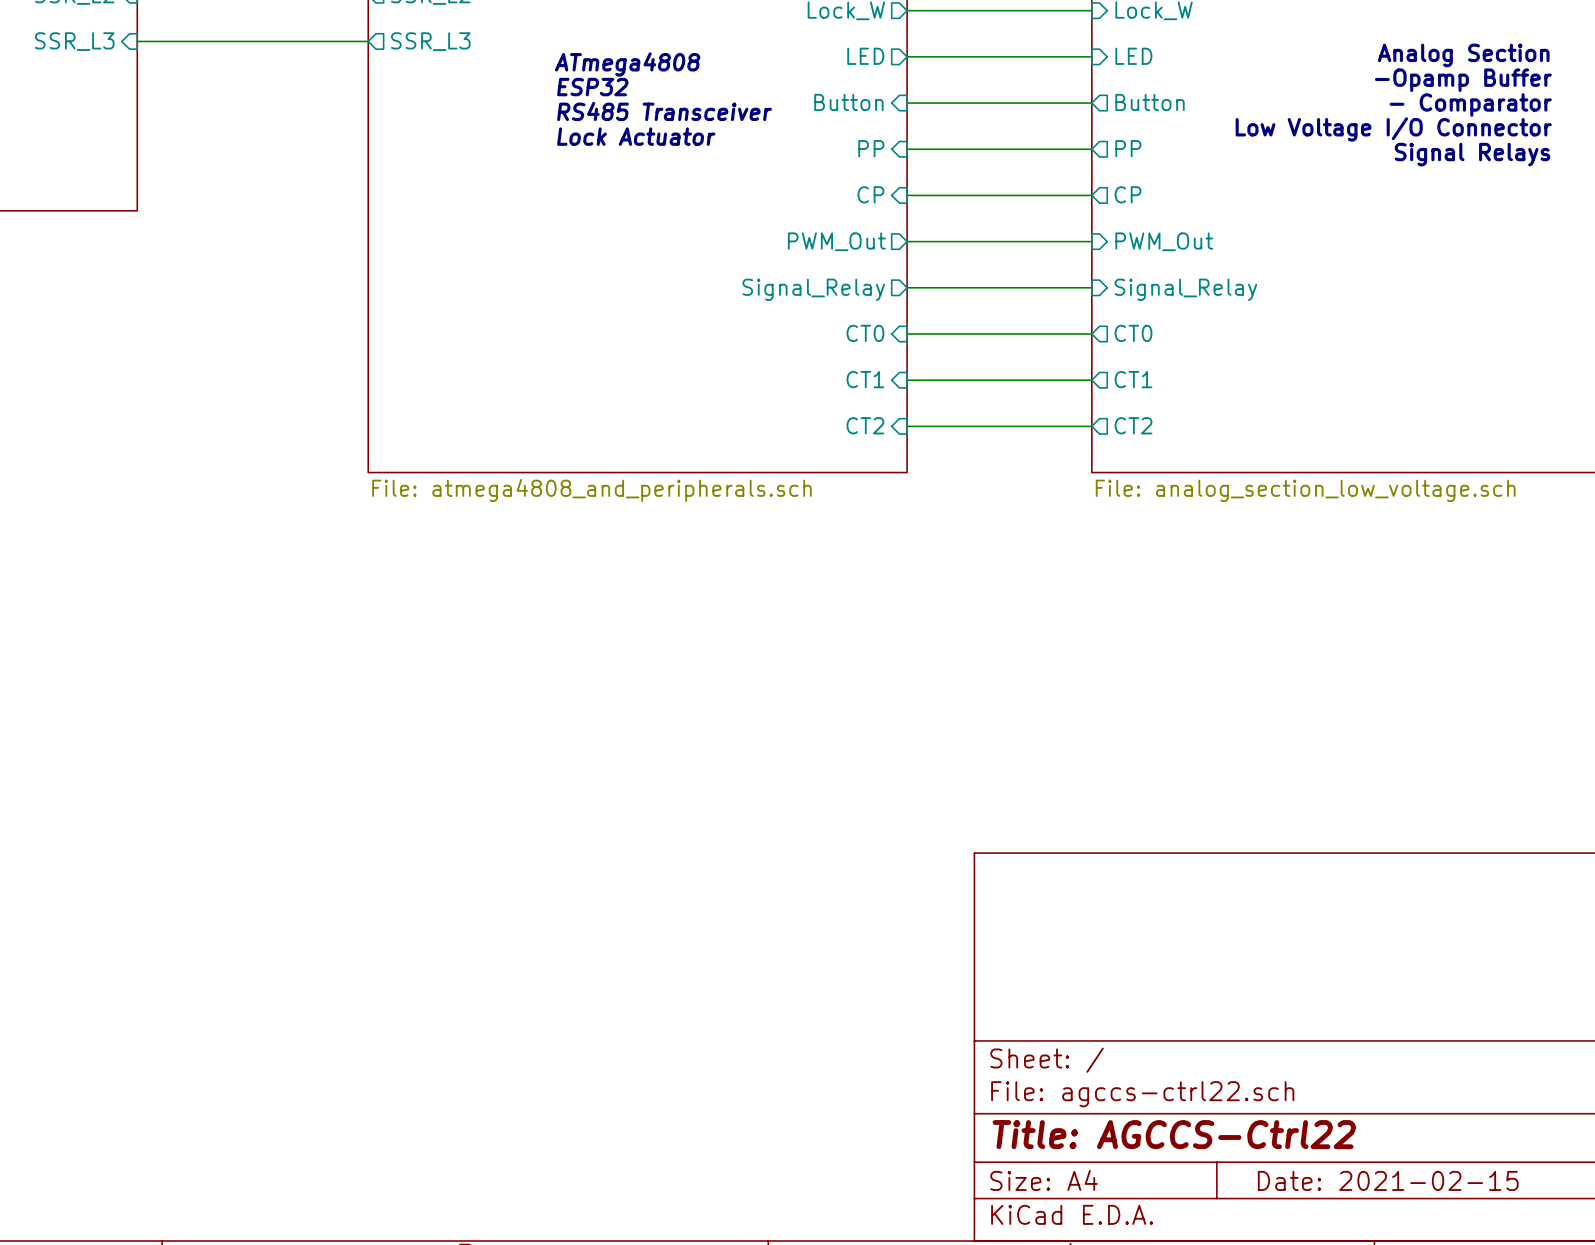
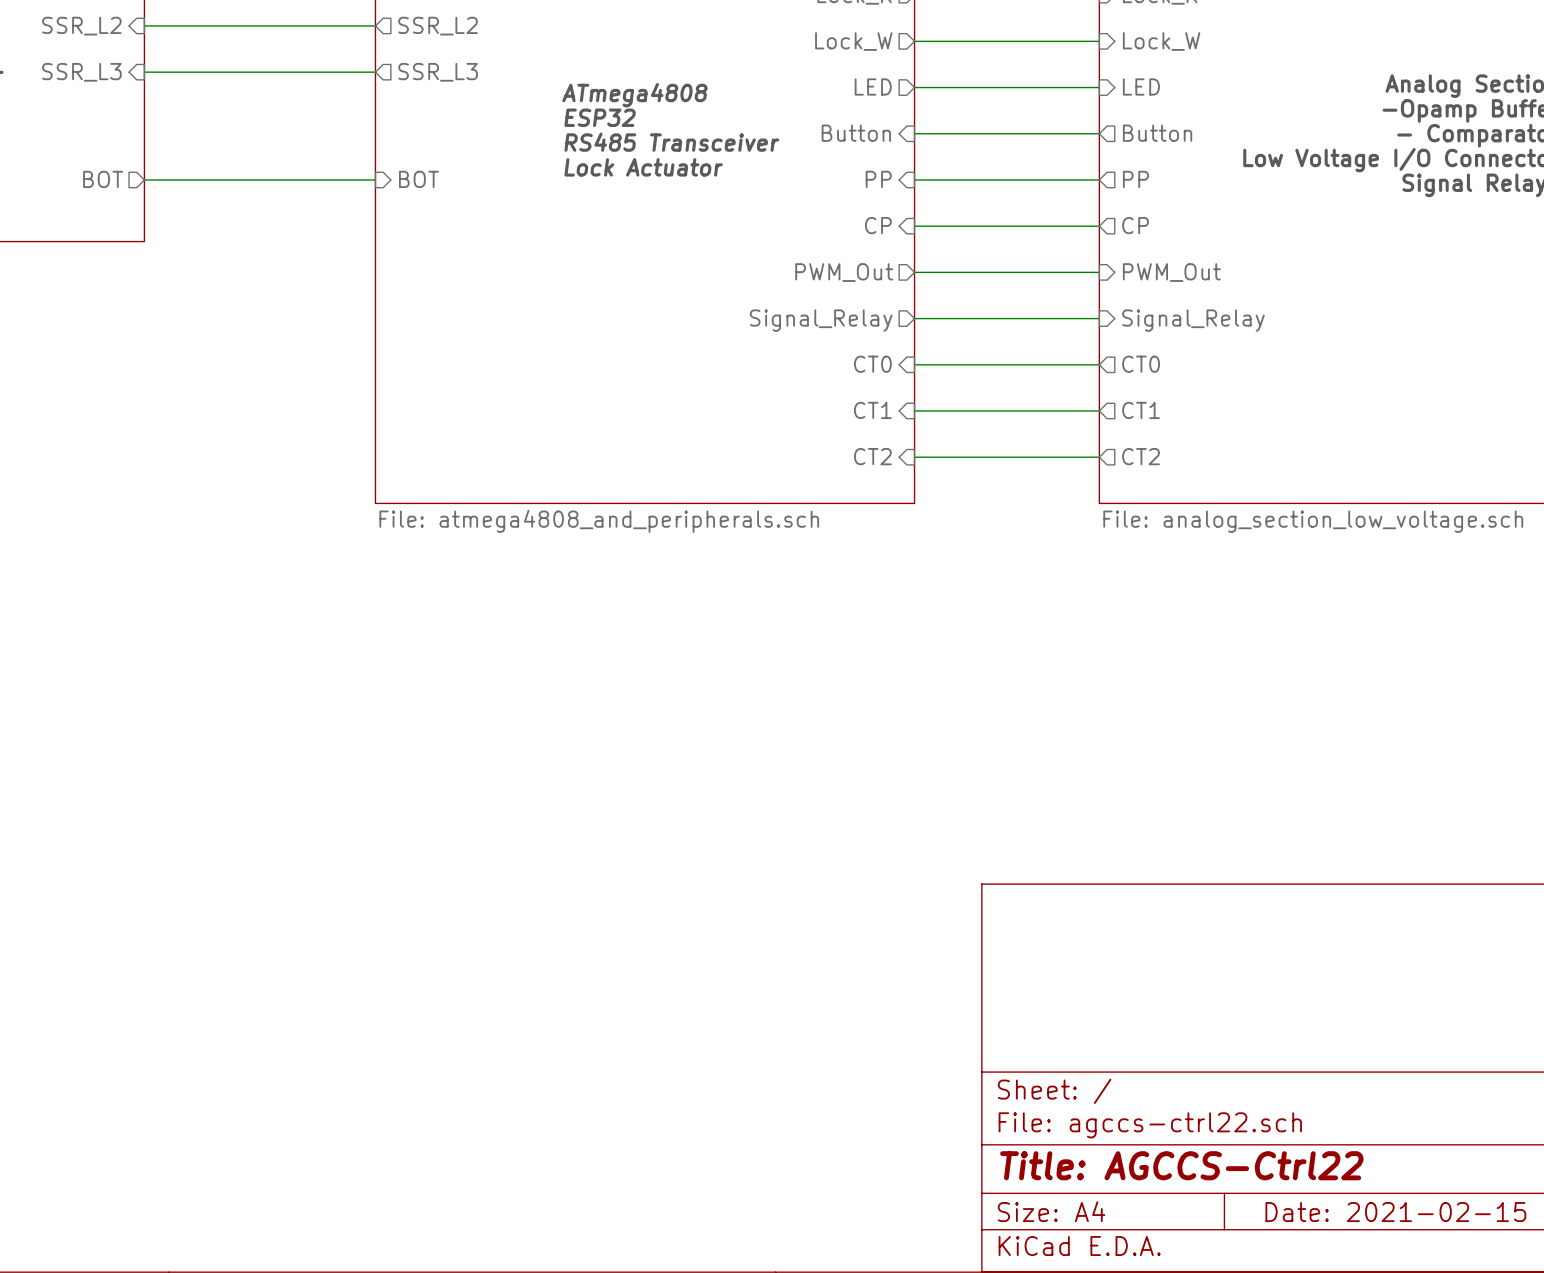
sheet pin: none -> BOT (103, 179)
sheet pin: none -> BOT (418, 179)
wire: none -> (144, 179) (375, 179)

